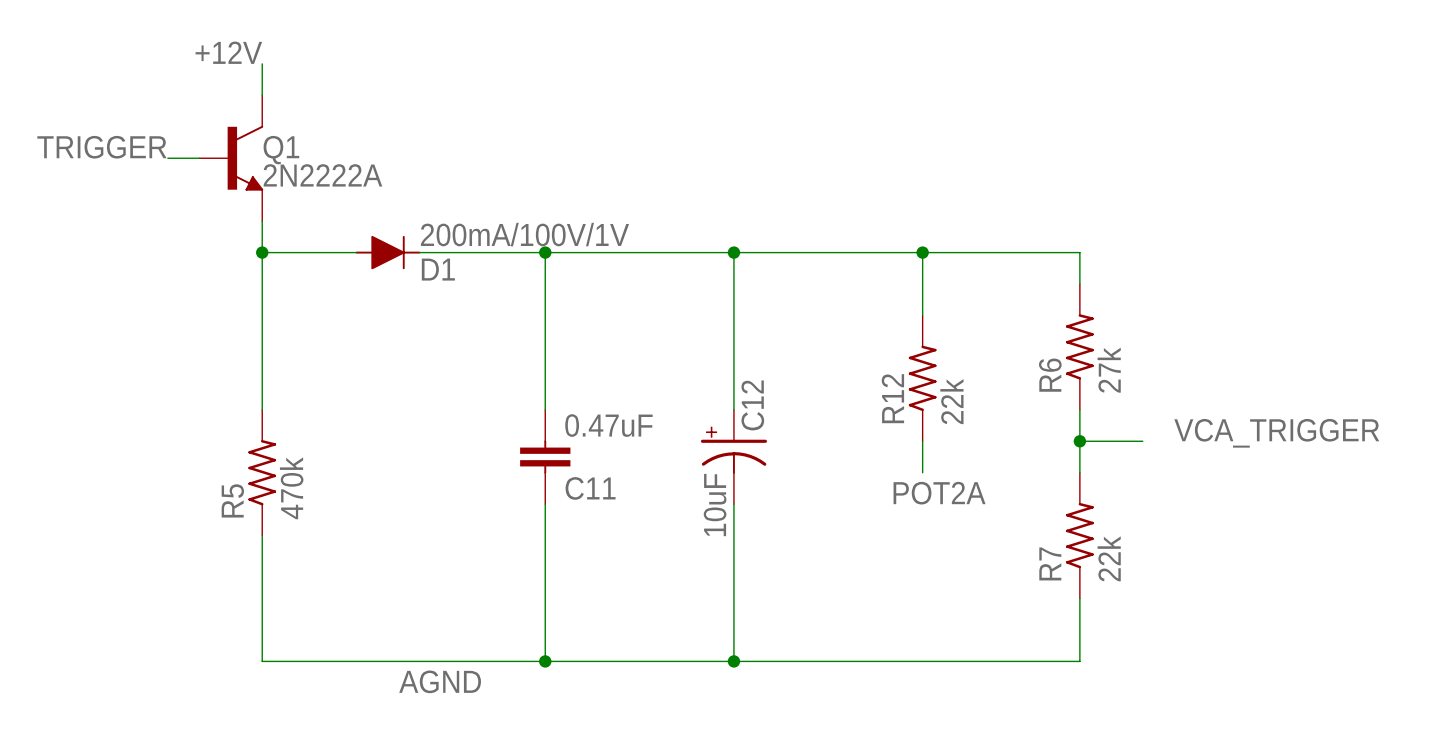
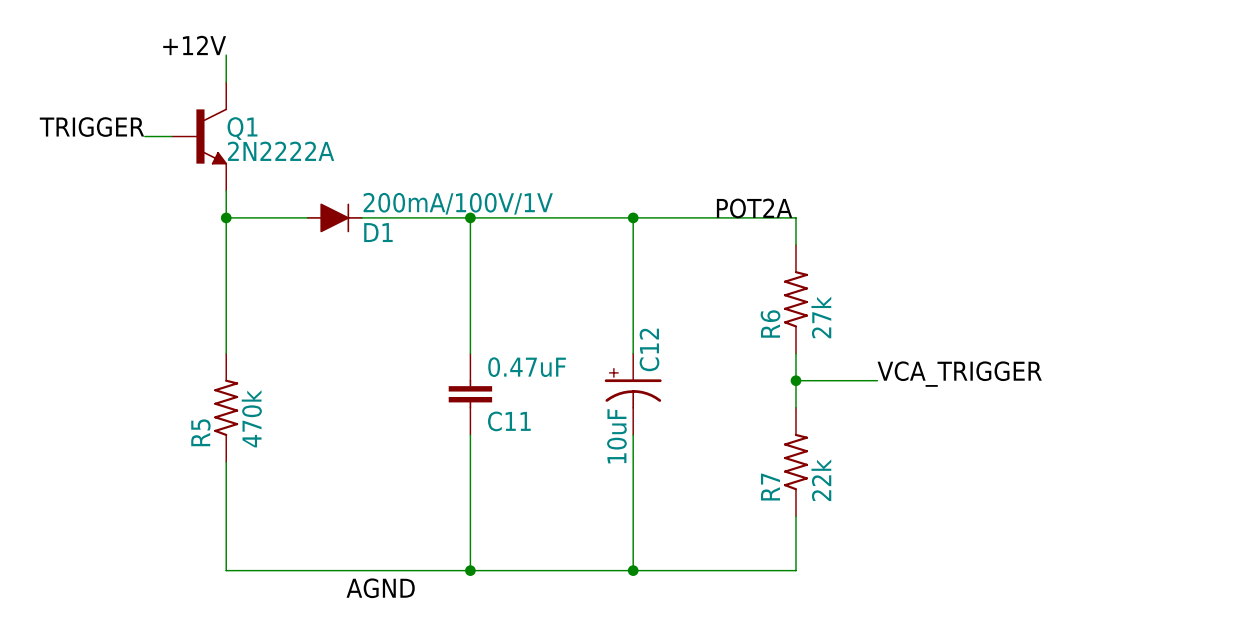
wire: (922, 252) (1079, 252) (1079, 284) -> none
junction: (922, 252) -> none
R6 position: (1079, 346) -> (795, 299)
R12: 22k (922, 378) -> none
wire: none -> (795, 353) (795, 380) (877, 380)
wire: (1079, 409) (1079, 472) -> none
label position: VCA_TRIGGER (1276, 433) -> VCA_TRIGGER (959, 374)
junction: none -> (795, 380)
wire: (1079, 441) (1142, 441) -> none
junction: (1079, 441) -> none
label position: POT2A (939, 493) -> POT2A (754, 208)
R7 position: (1079, 535) -> (795, 462)
wire: (1079, 598) (1079, 661) (922, 661) -> (795, 516) (795, 570)

